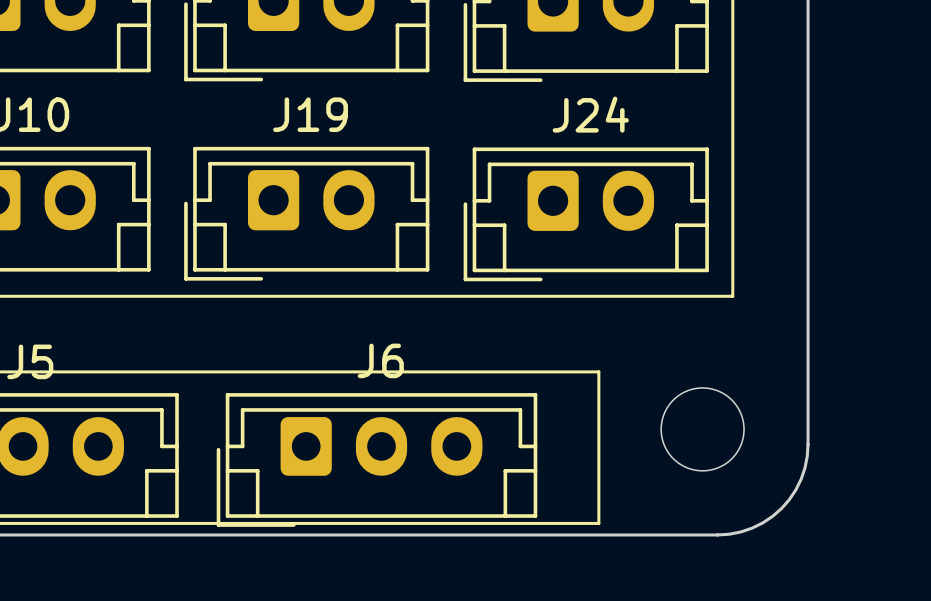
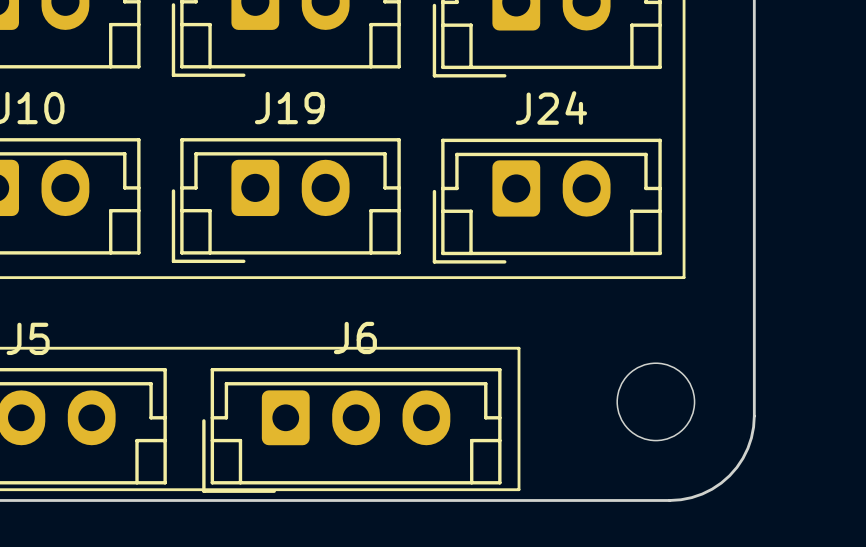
line: (556, 371) (598, 371) (598, 523) (556, 523) -> (519, 348) (519, 489)

